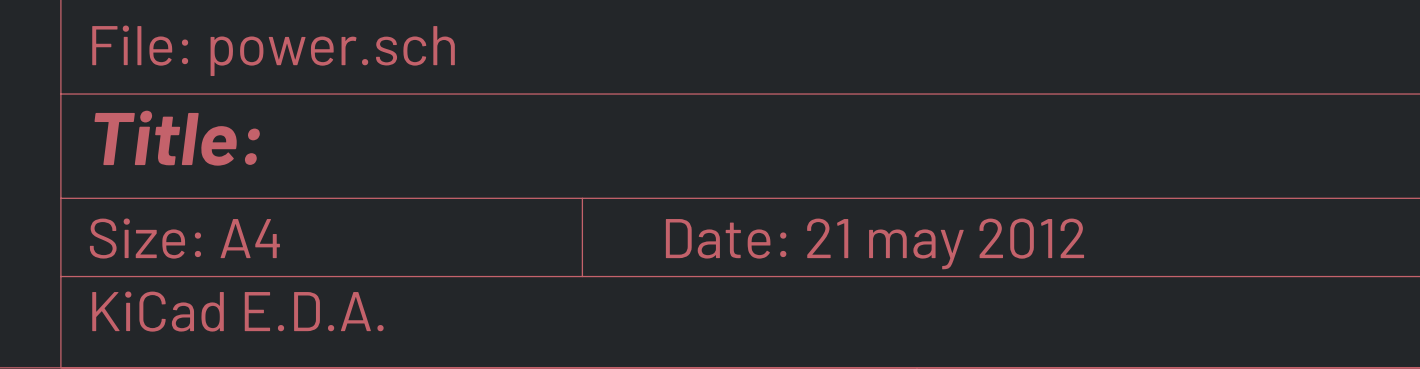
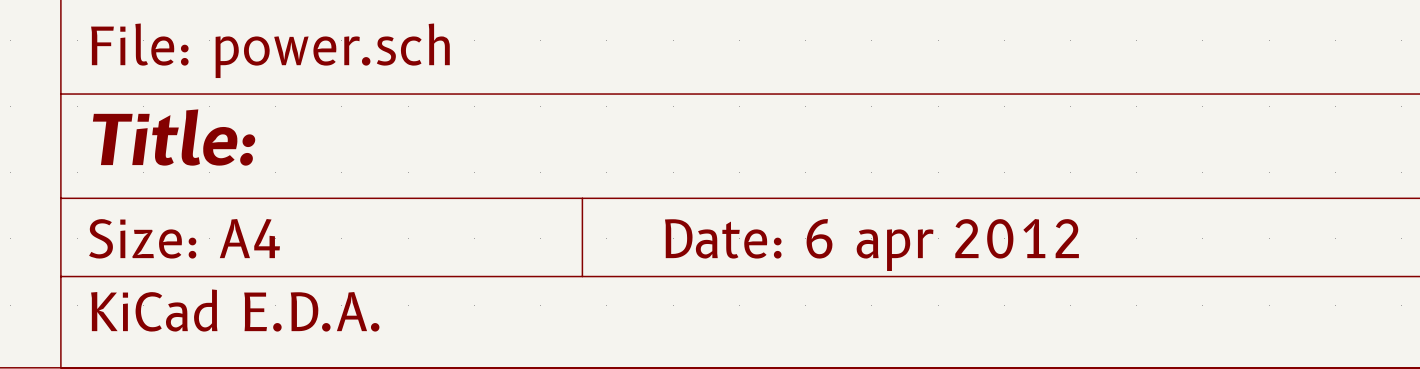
title block: Date: 21 may 2012 (874, 243) -> Date: 6 apr 2012 (871, 245)

